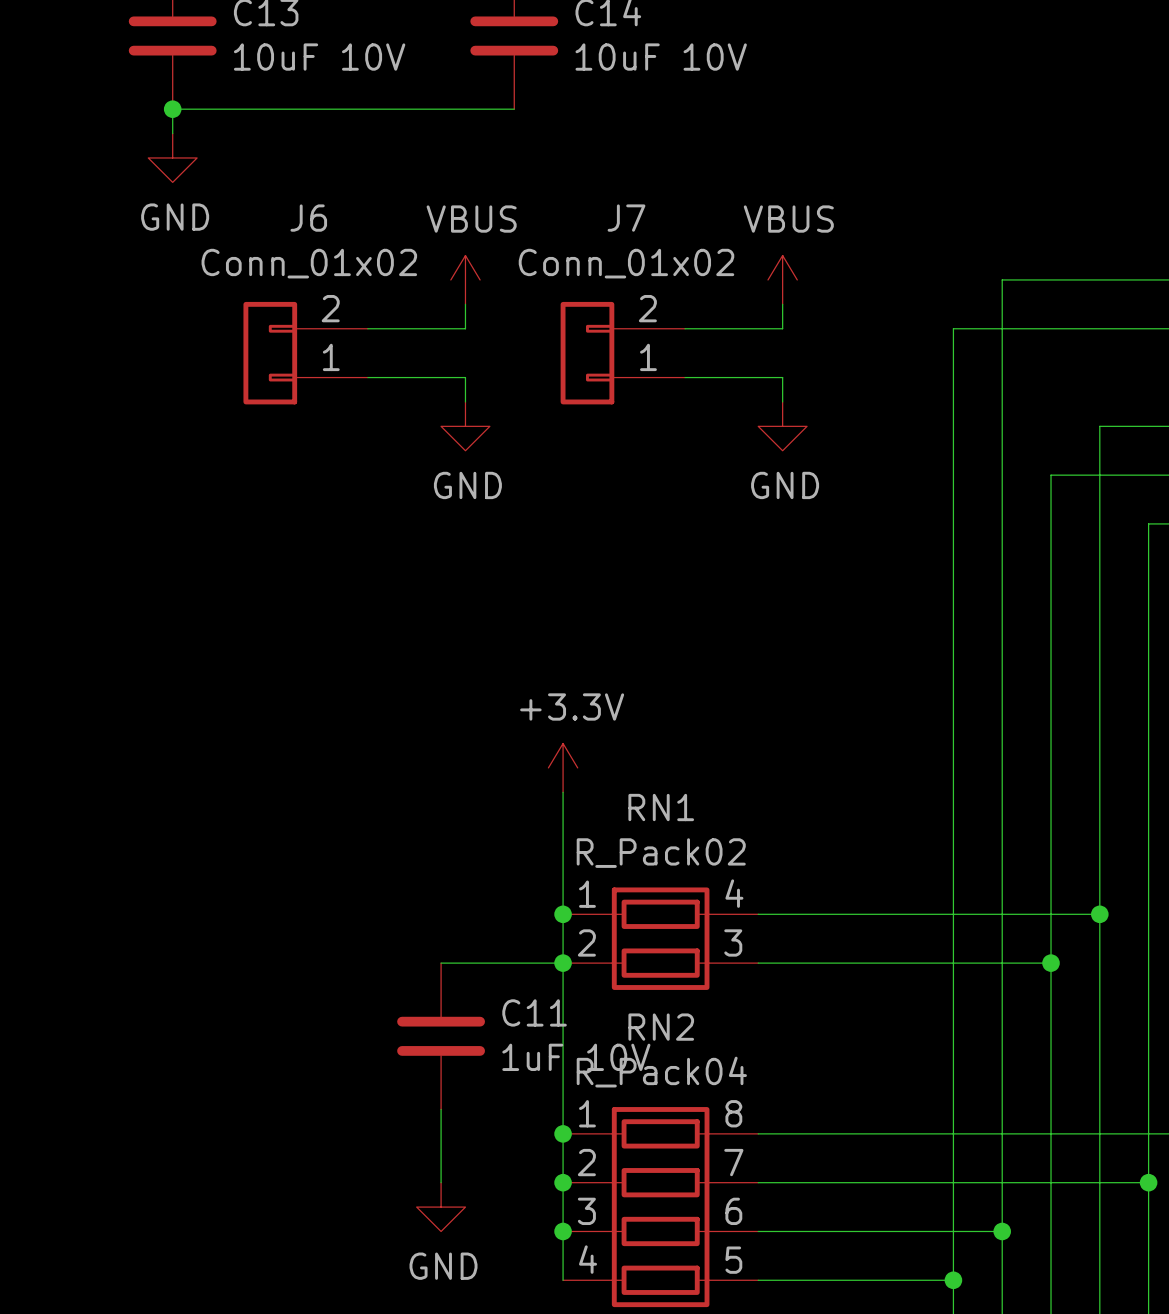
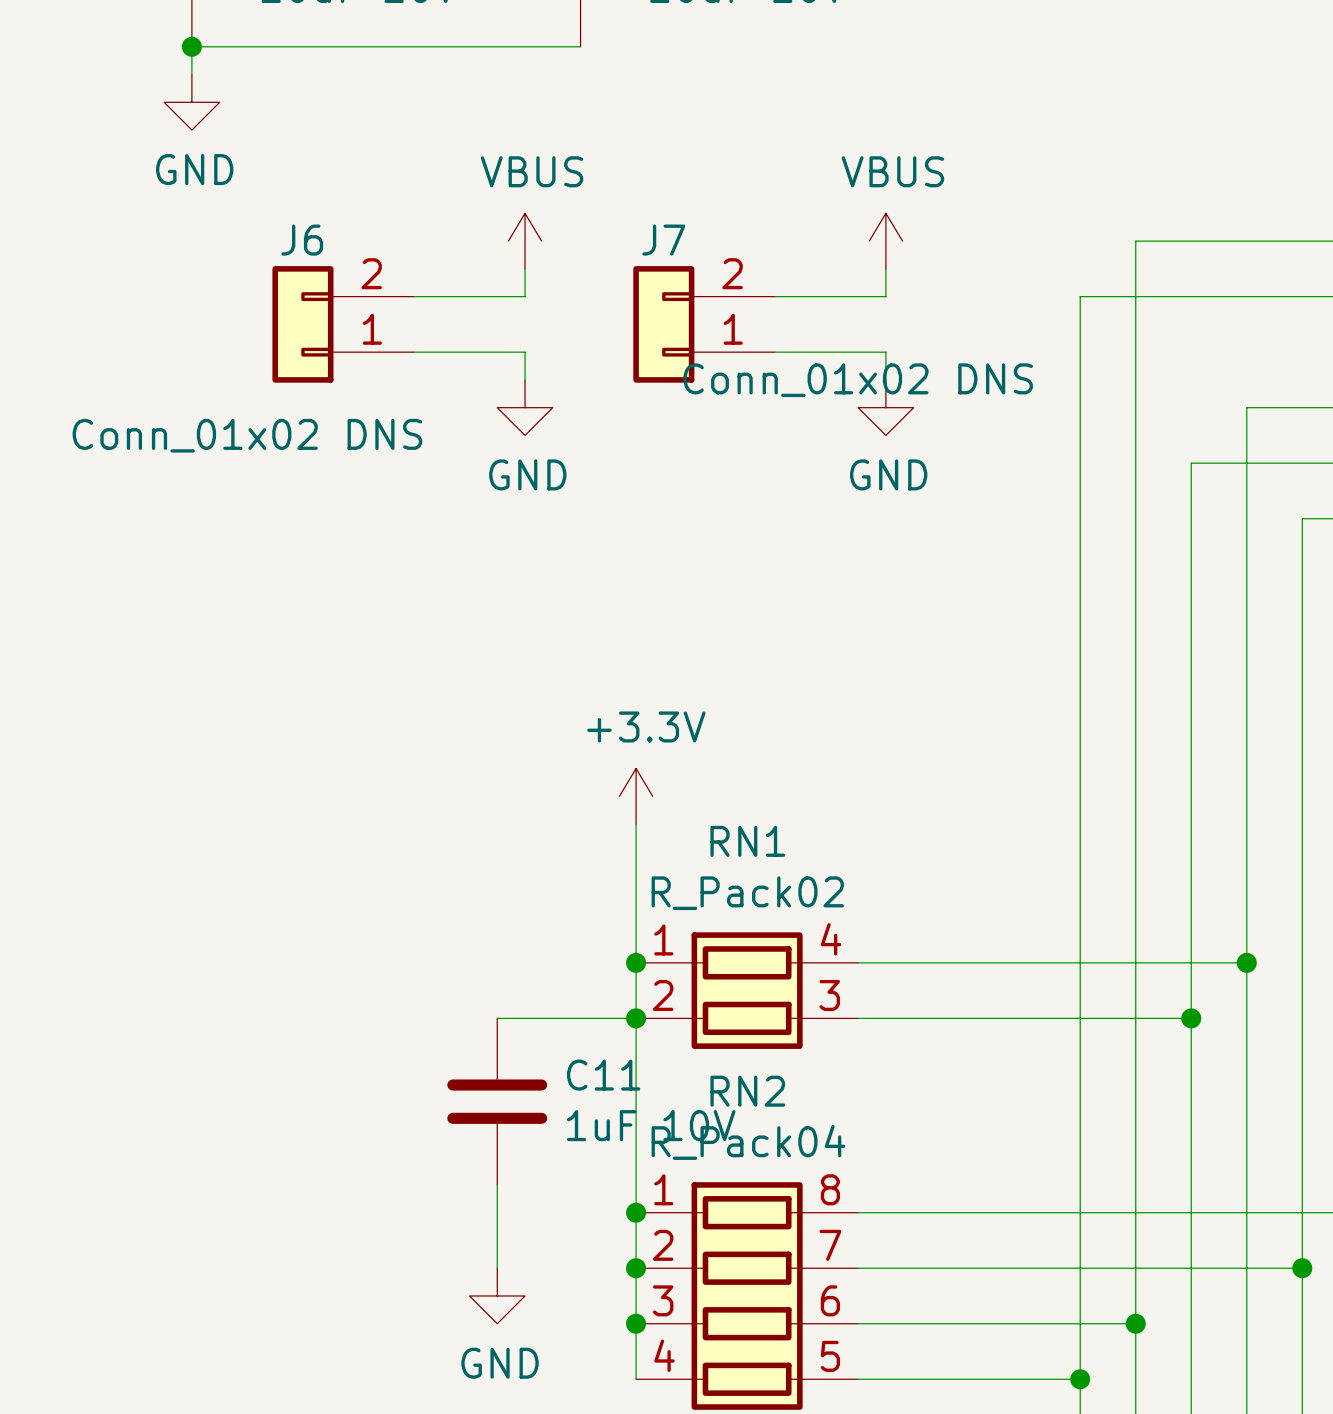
J6 name position: J6 (308, 218) -> J6 (302, 240)
J7 name position: J7 (626, 218) -> J7 (663, 240)
J6 value: Conn_01x02 (309, 263) -> Conn_01x02 DNS (247, 435)
J7 value: Conn_01x02 (626, 263) -> Conn_01x02 DNS (858, 380)

